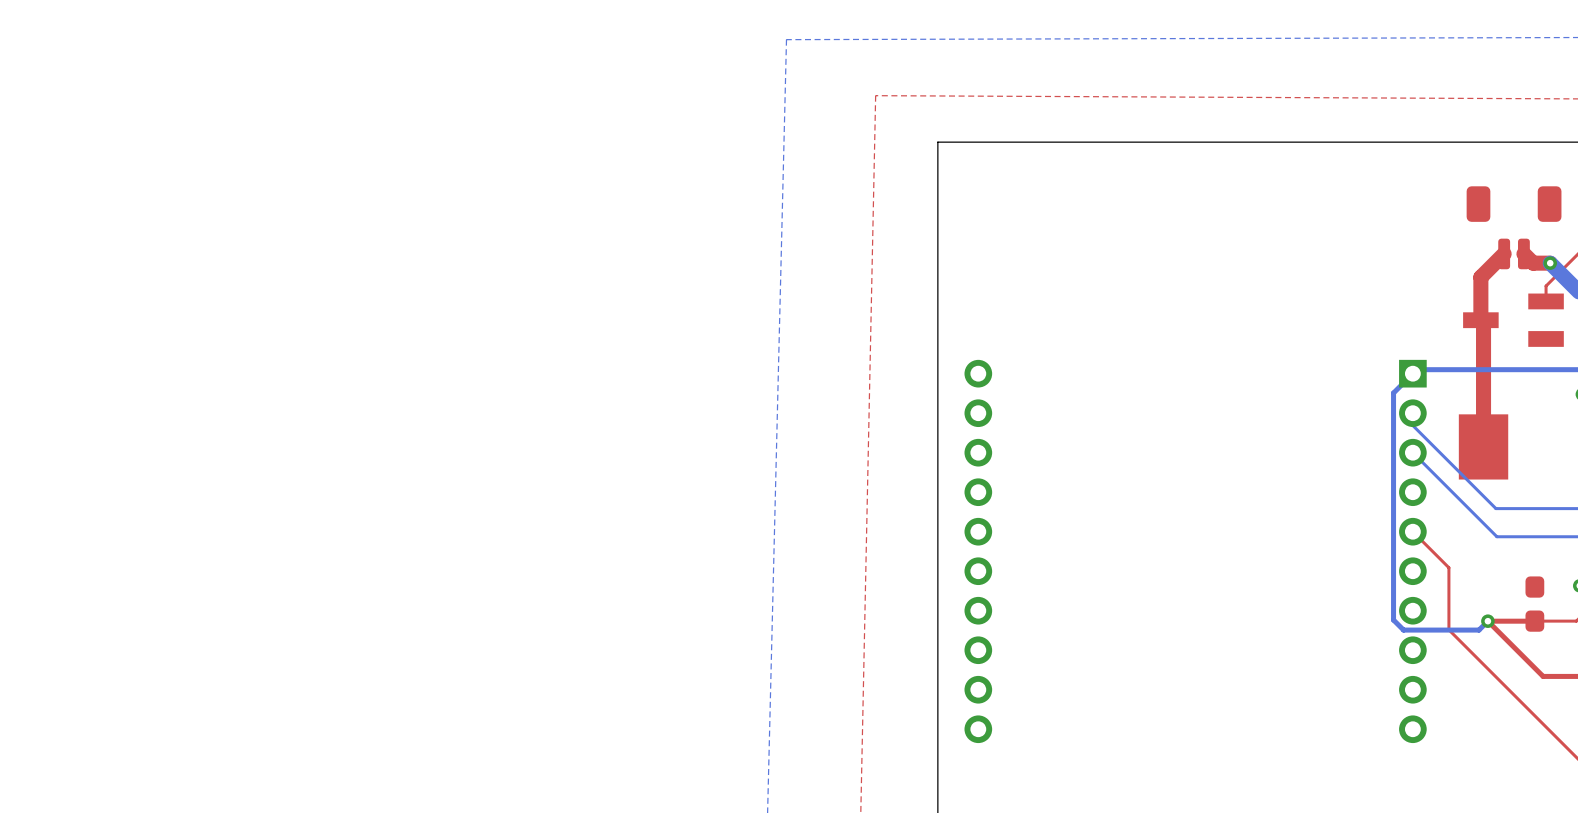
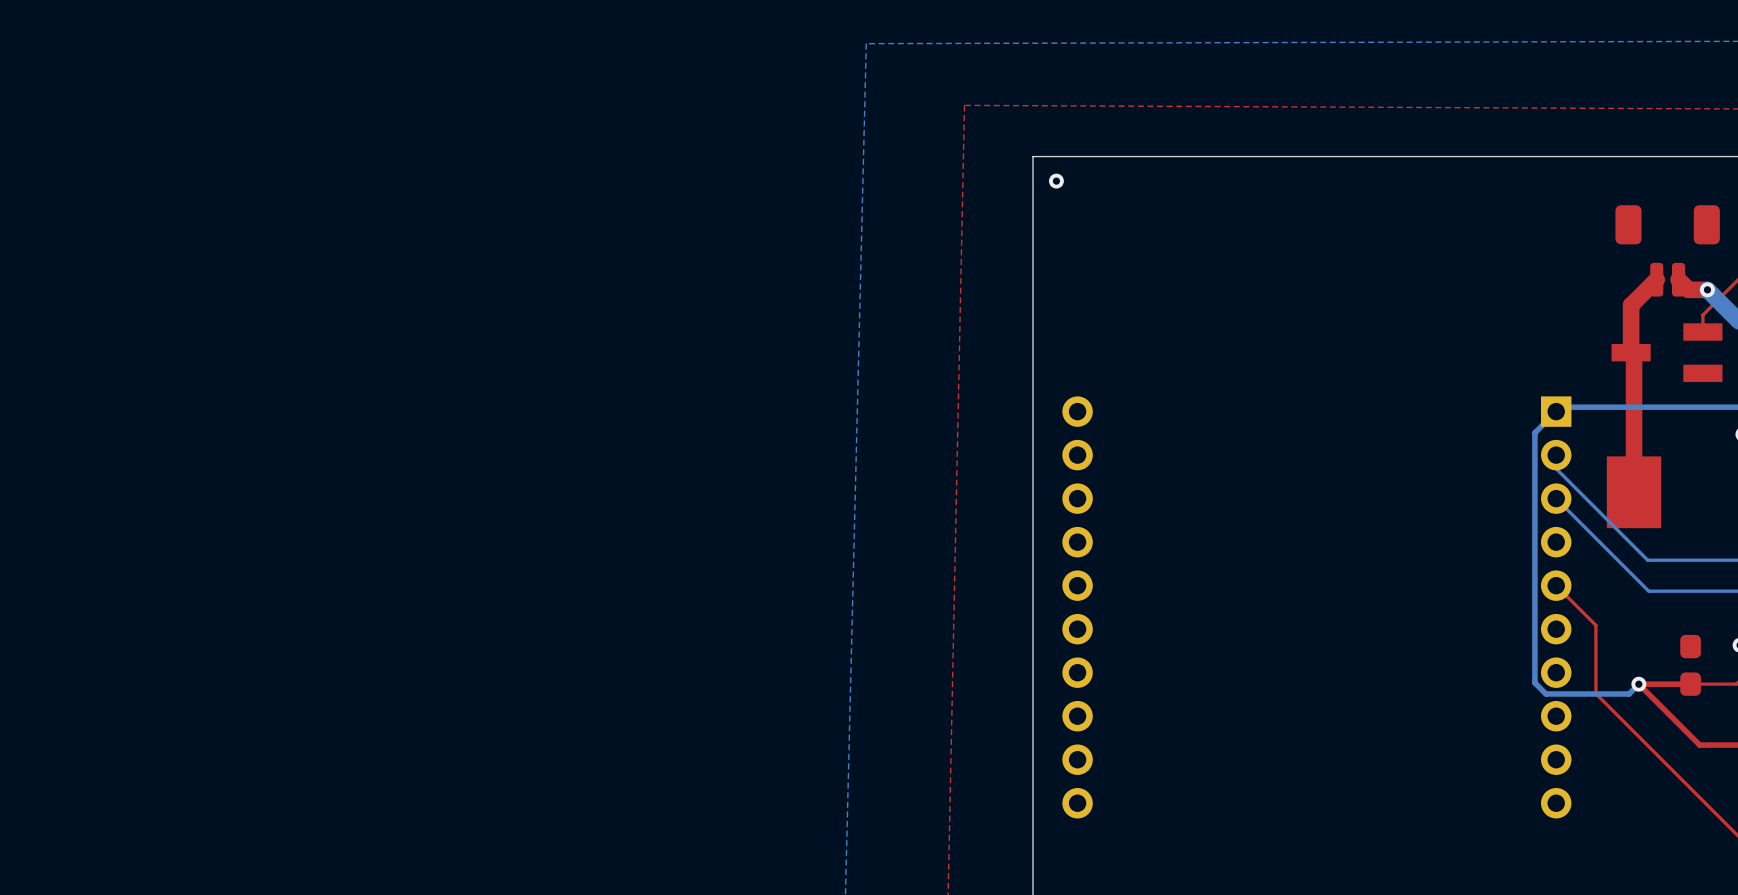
via: none -> (1056, 181)

